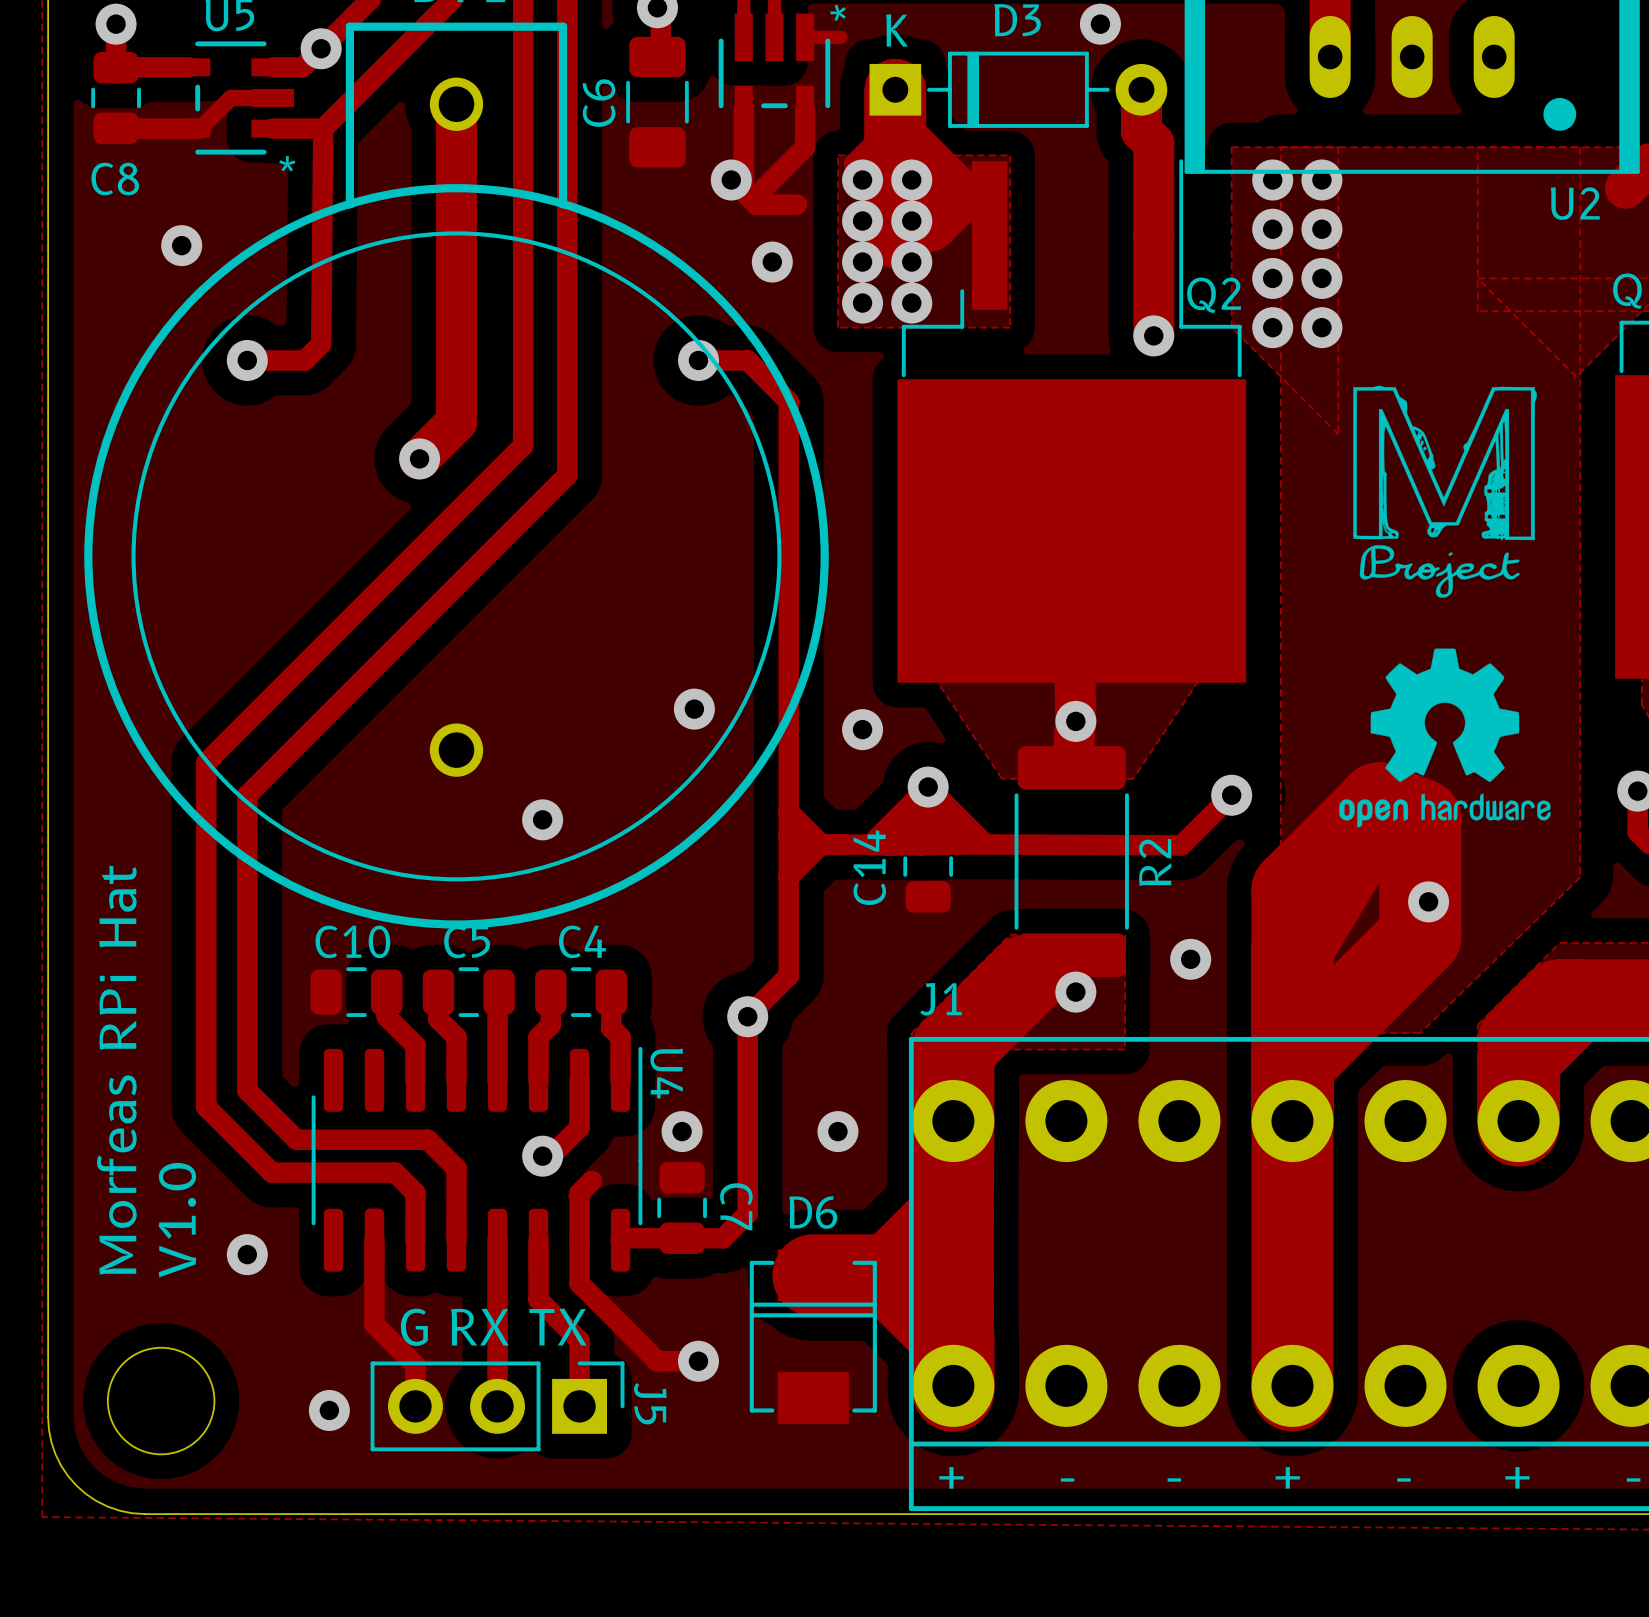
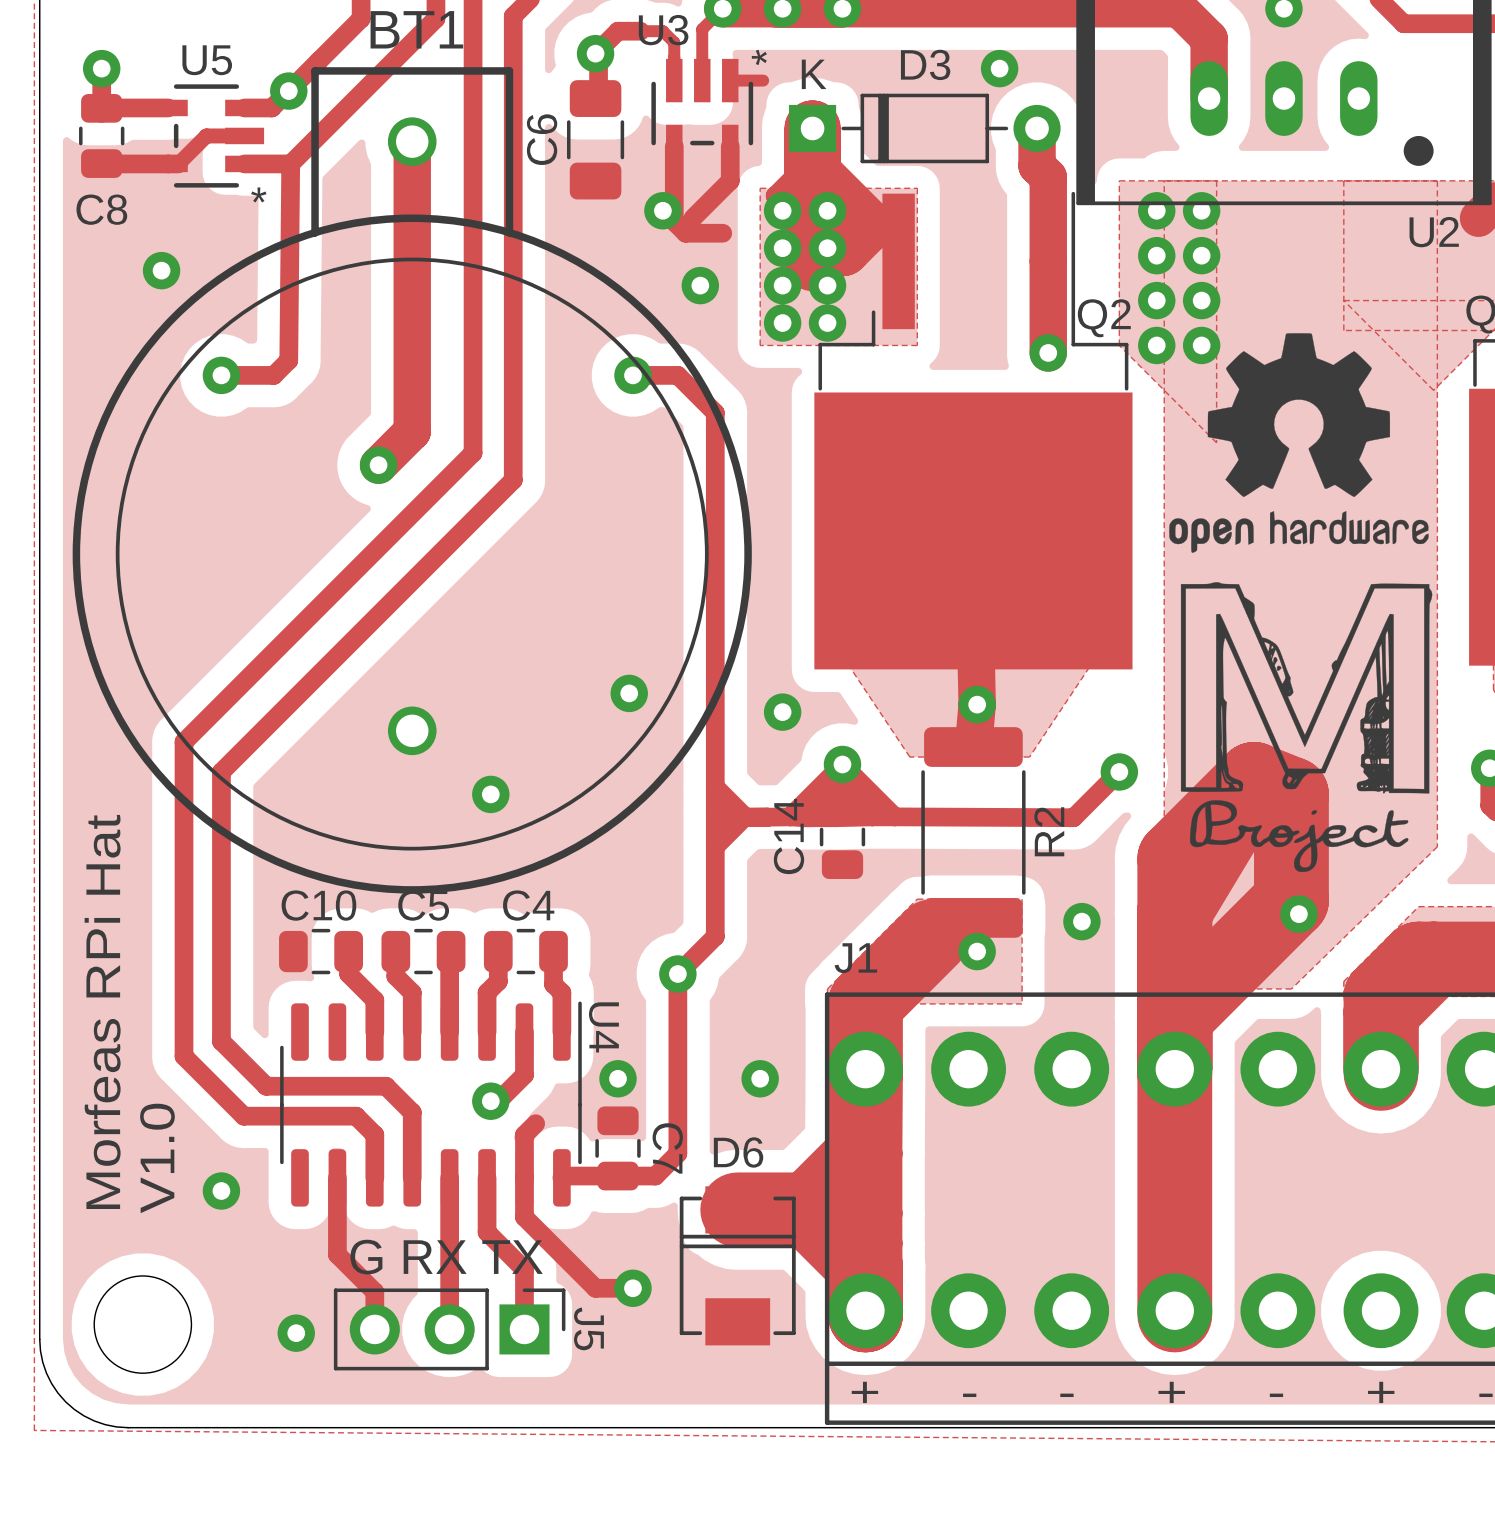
drawing: none -> [1169, 333, 1429, 553]
drawing: [1353, 385, 1538, 598] -> none
drawing shape: [1339, 648, 1551, 828] -> [1180, 582, 1433, 872]
via position: (1428, 901) -> (1298, 914)

